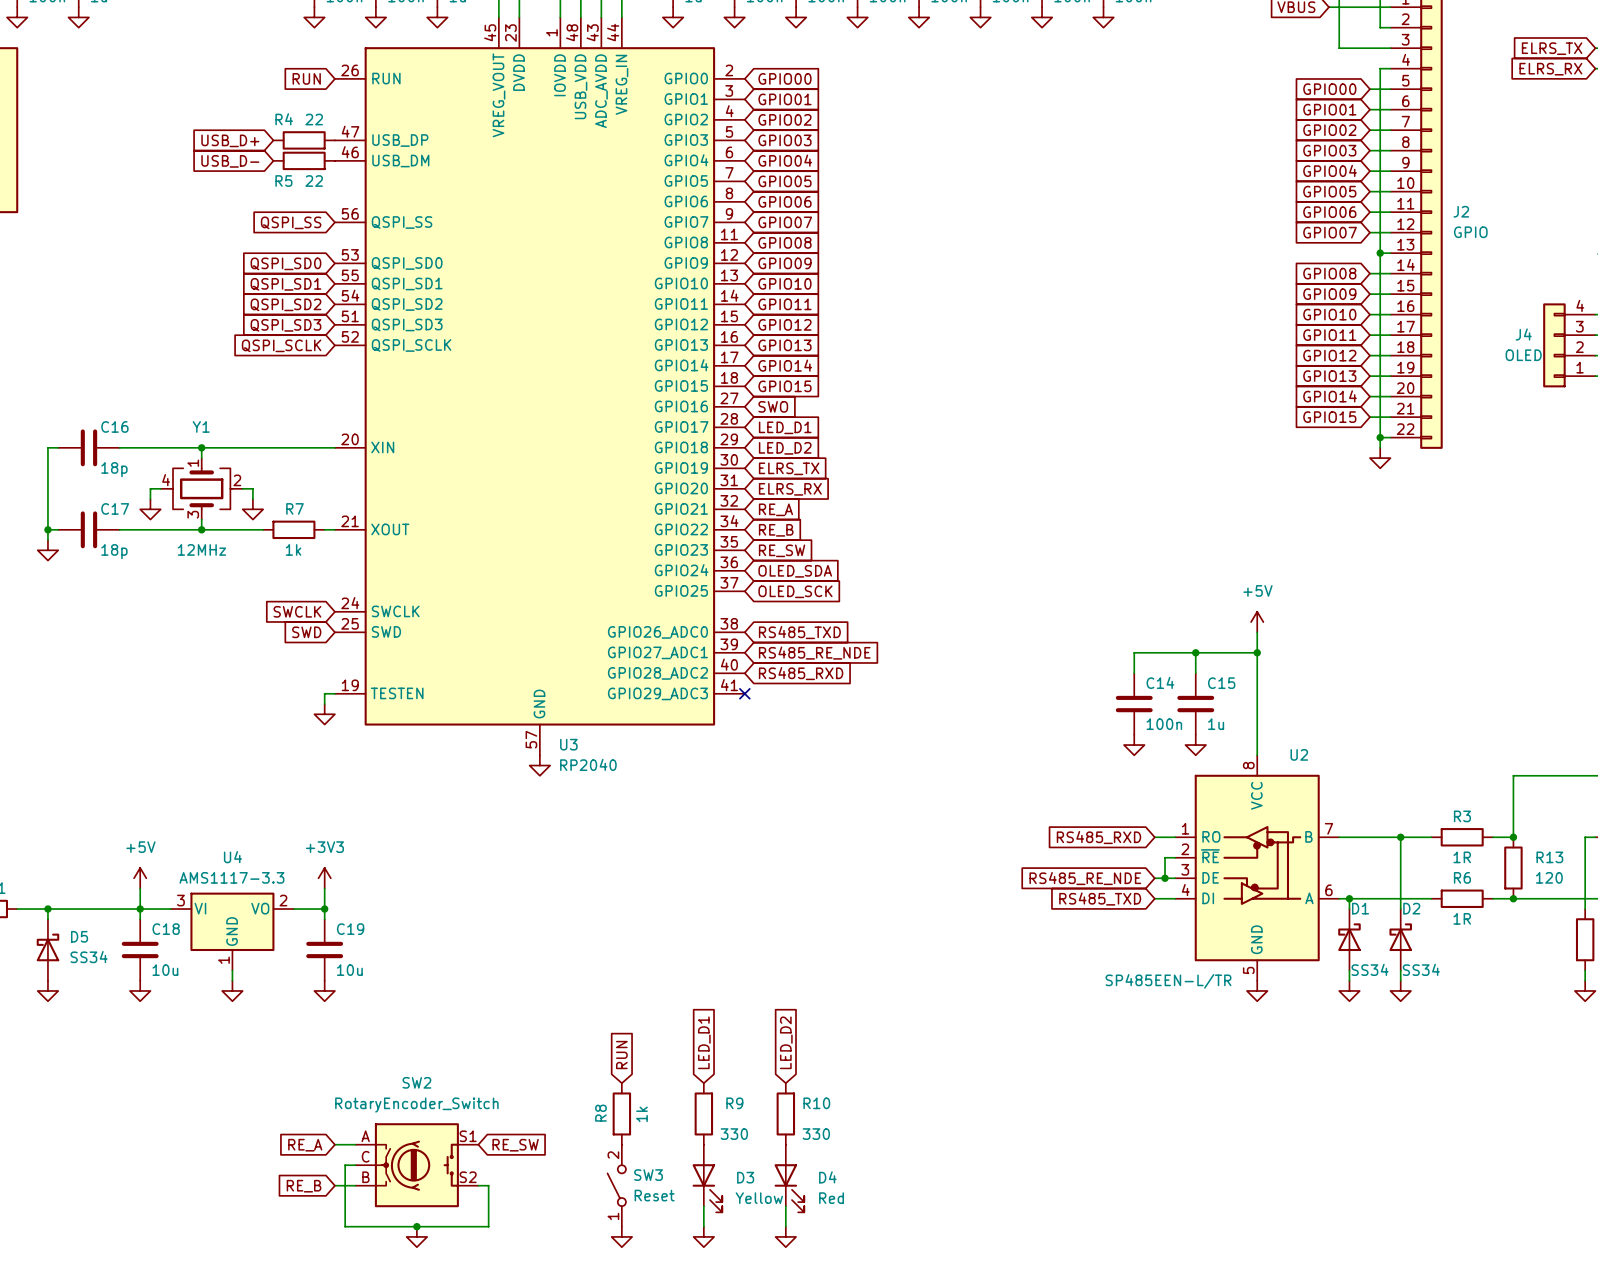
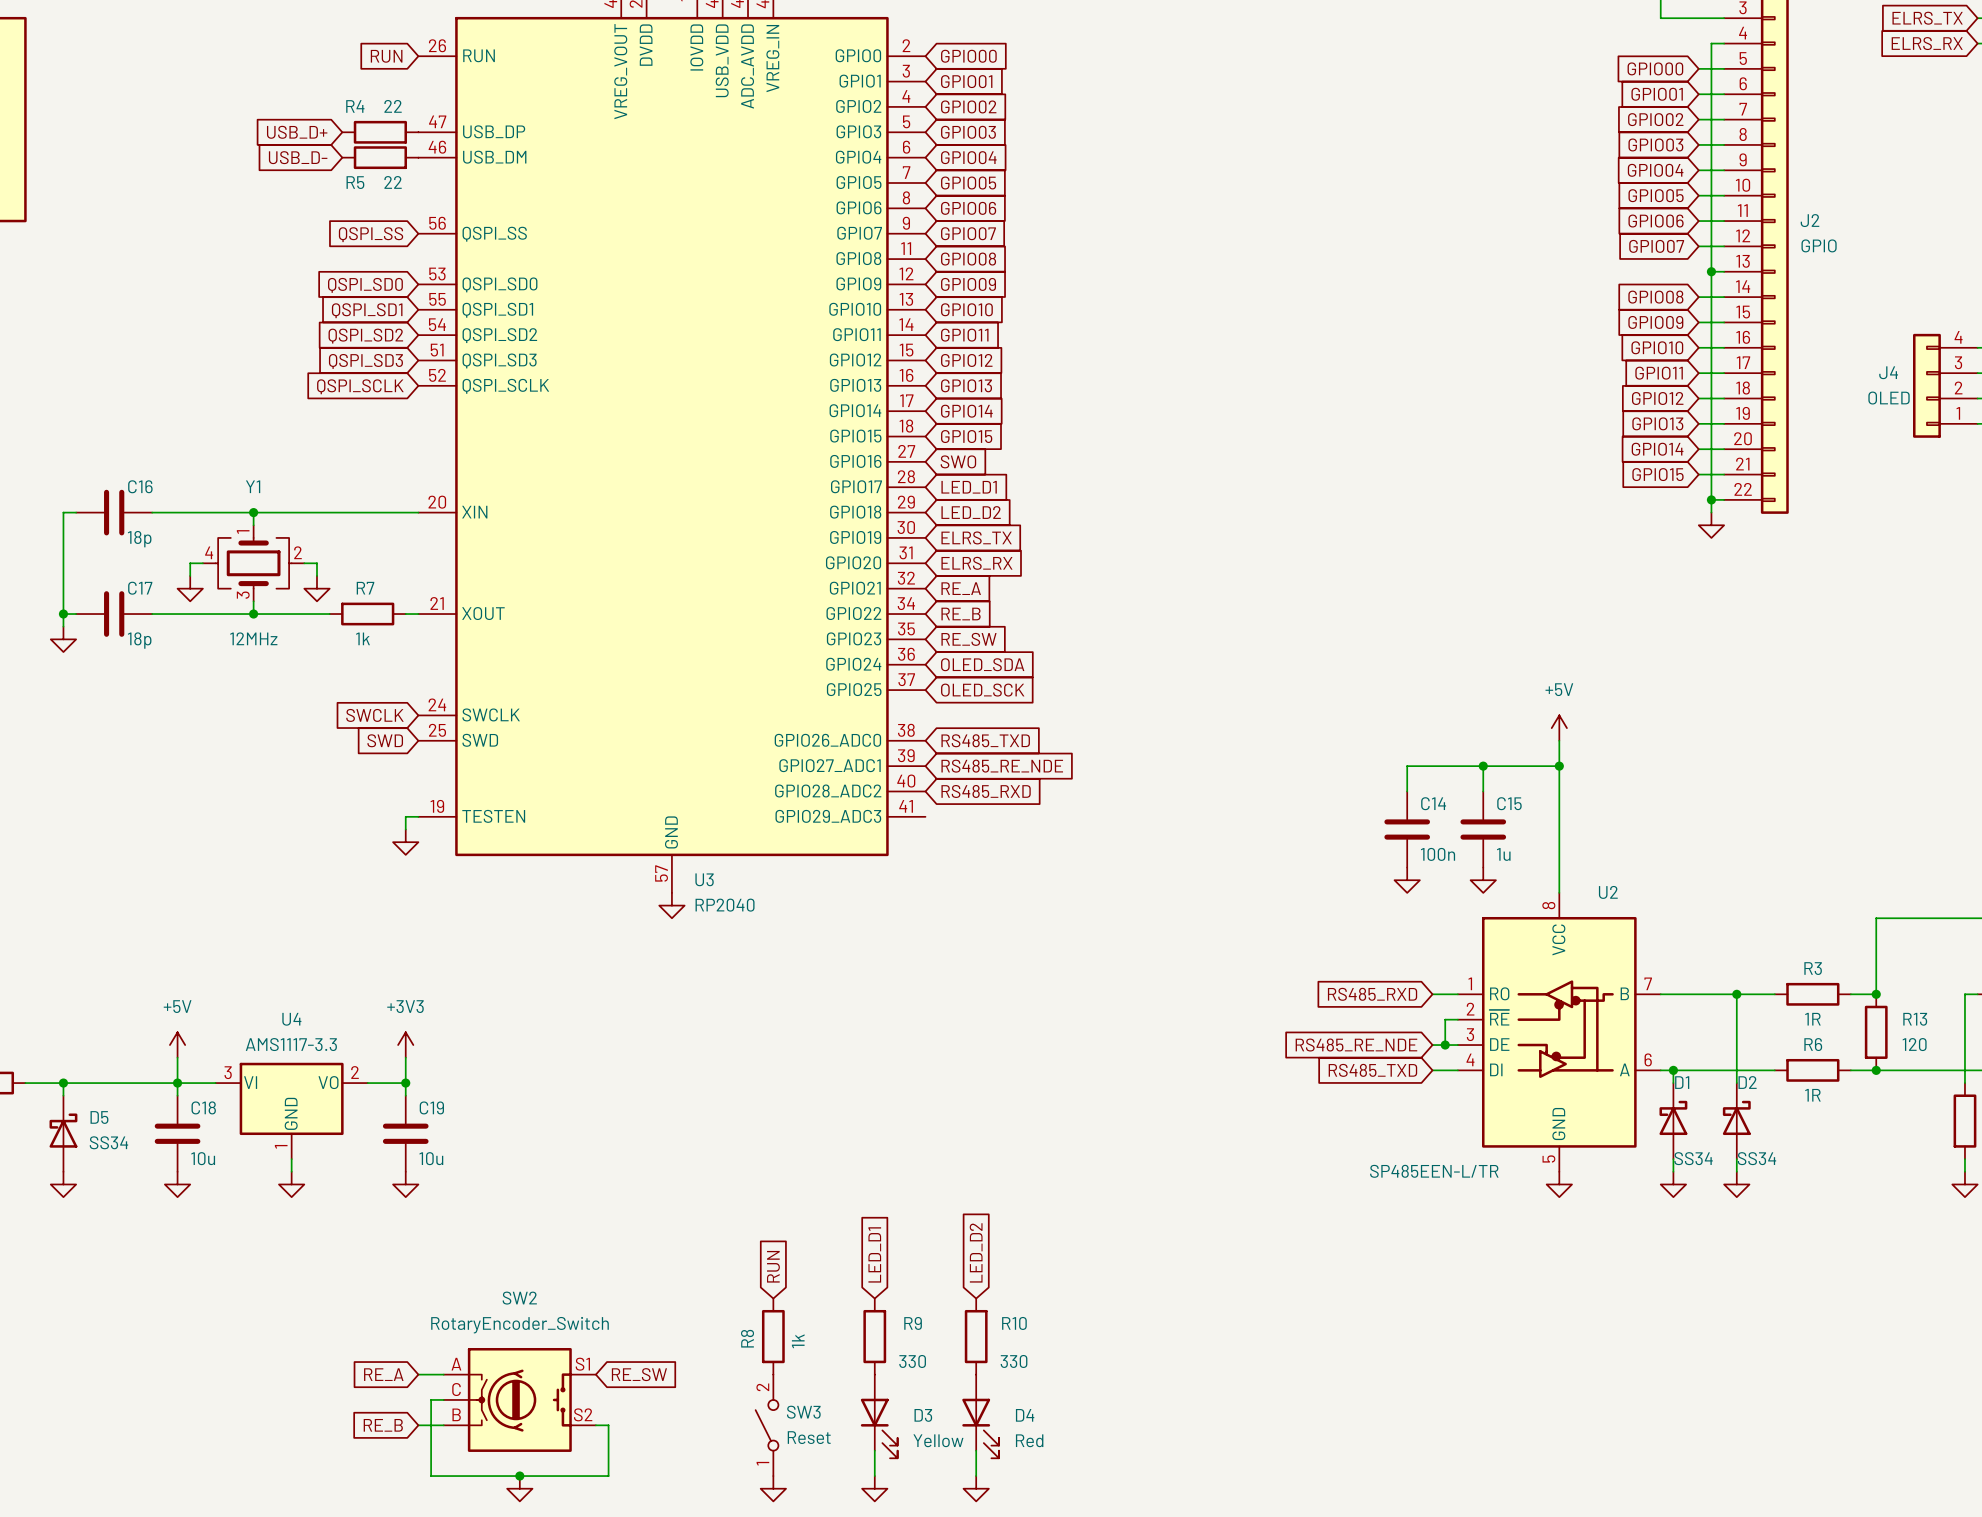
no-connect mark: (744, 693) -> none

